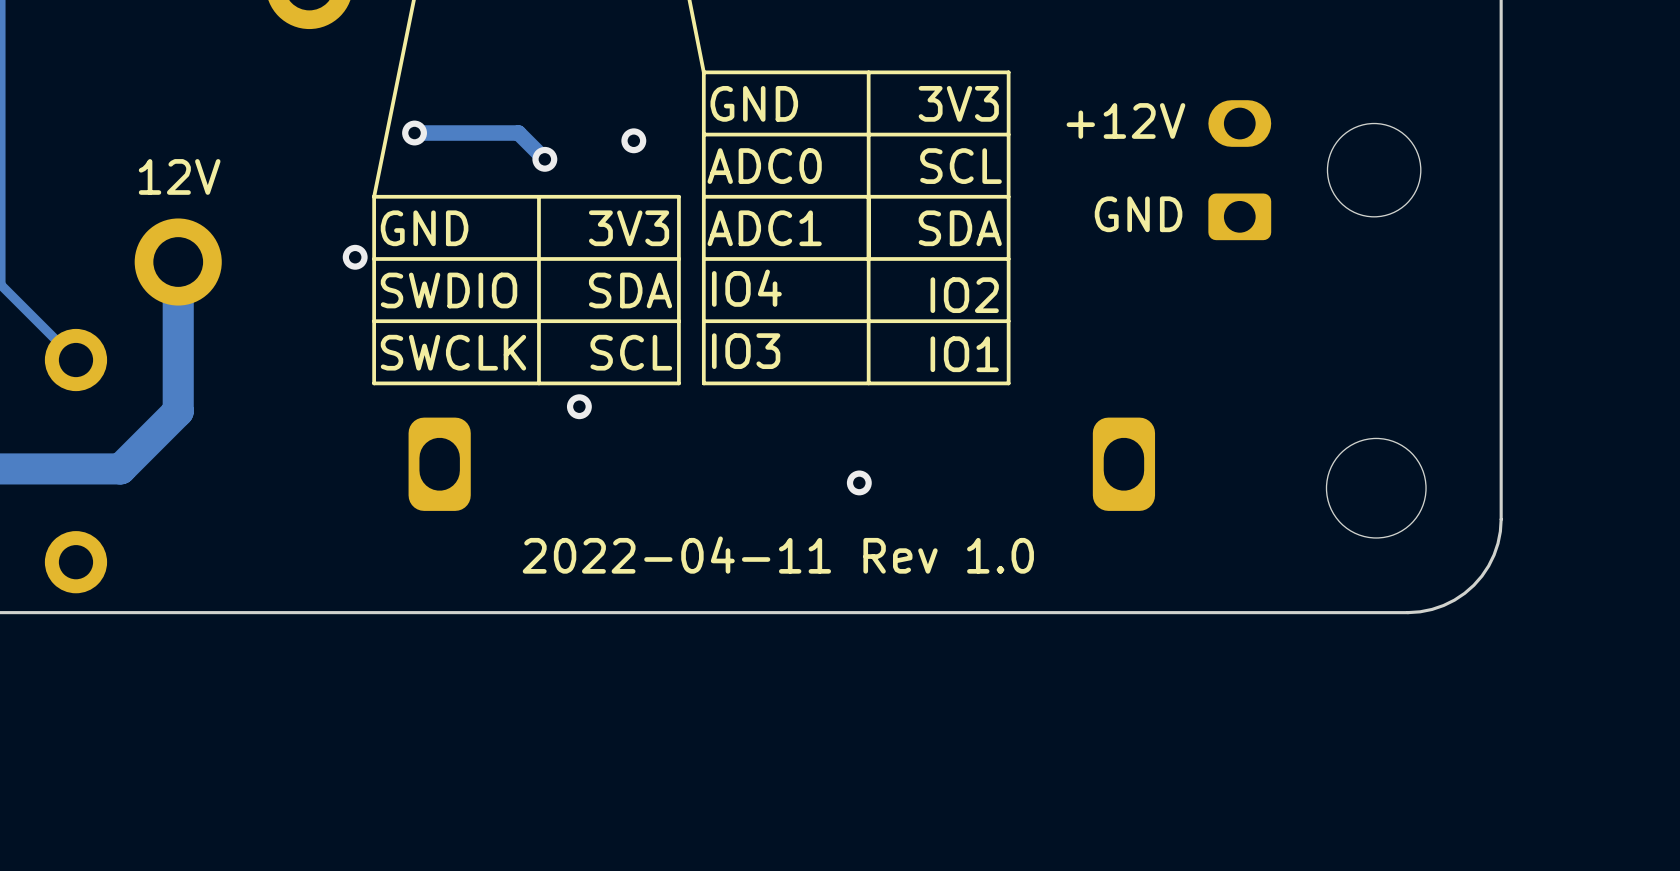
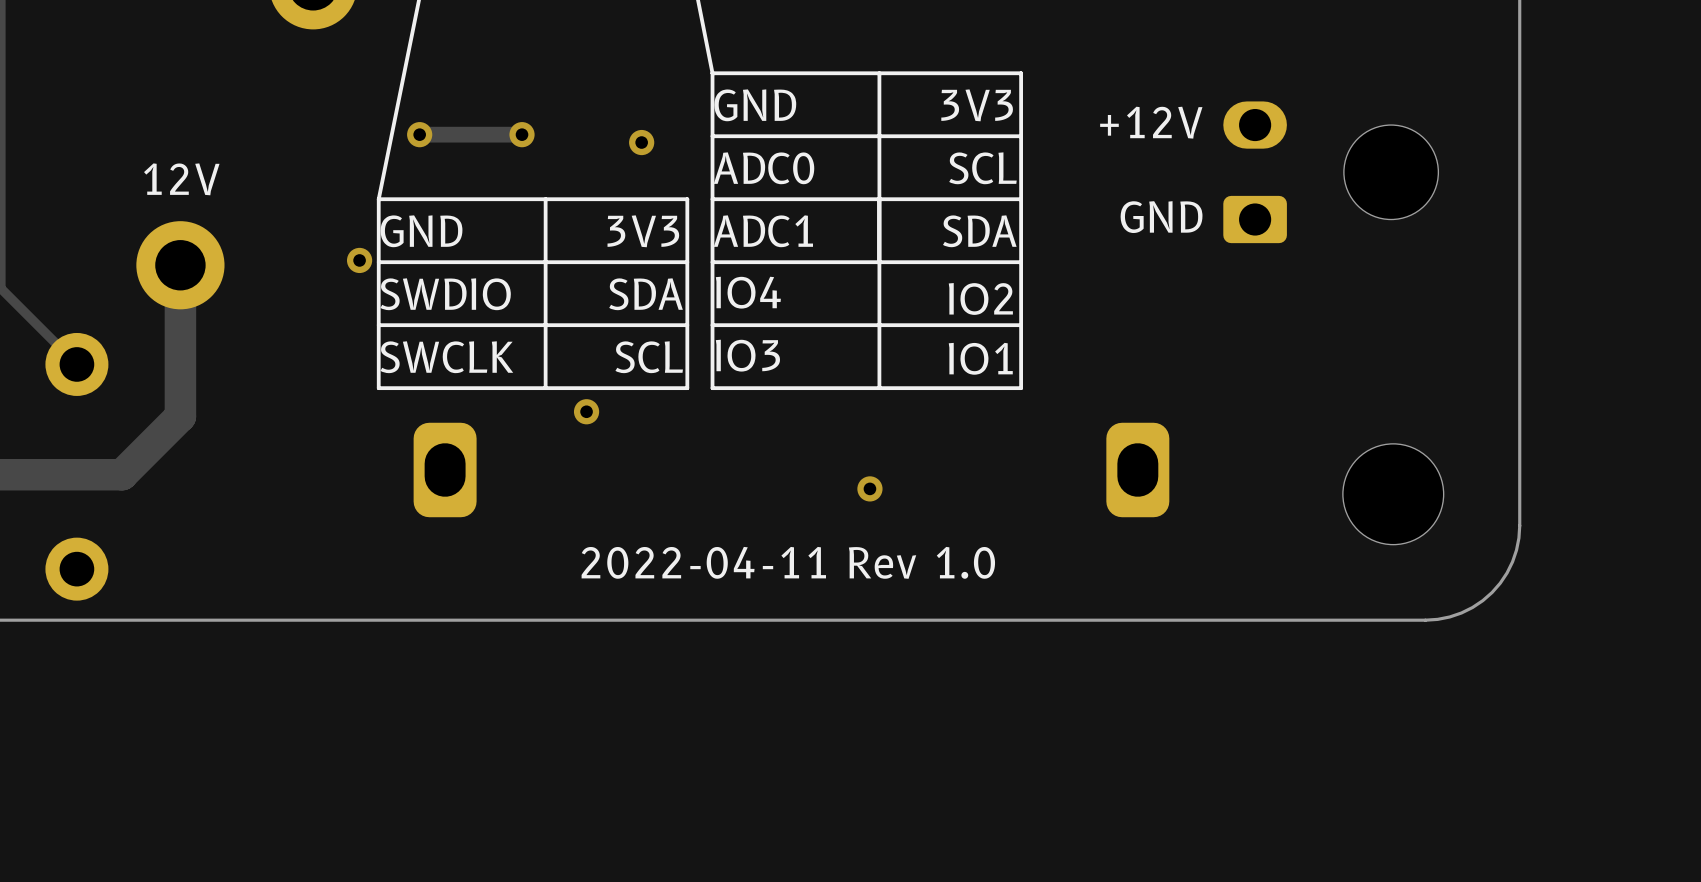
track: (515, 133) (518, 133) (544, 159) -> none
via position: (544, 159) -> (522, 134)

